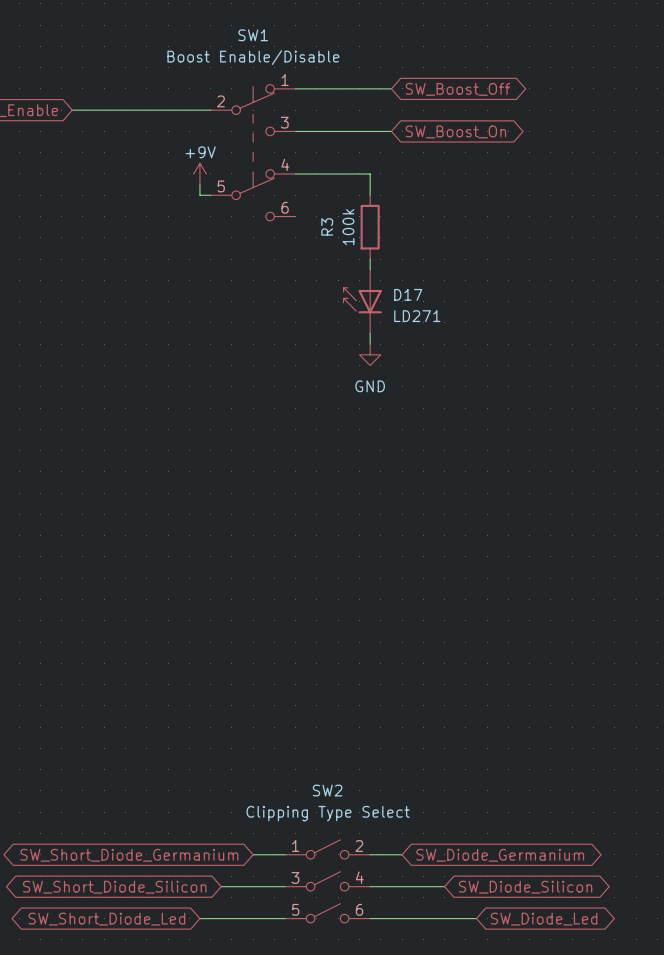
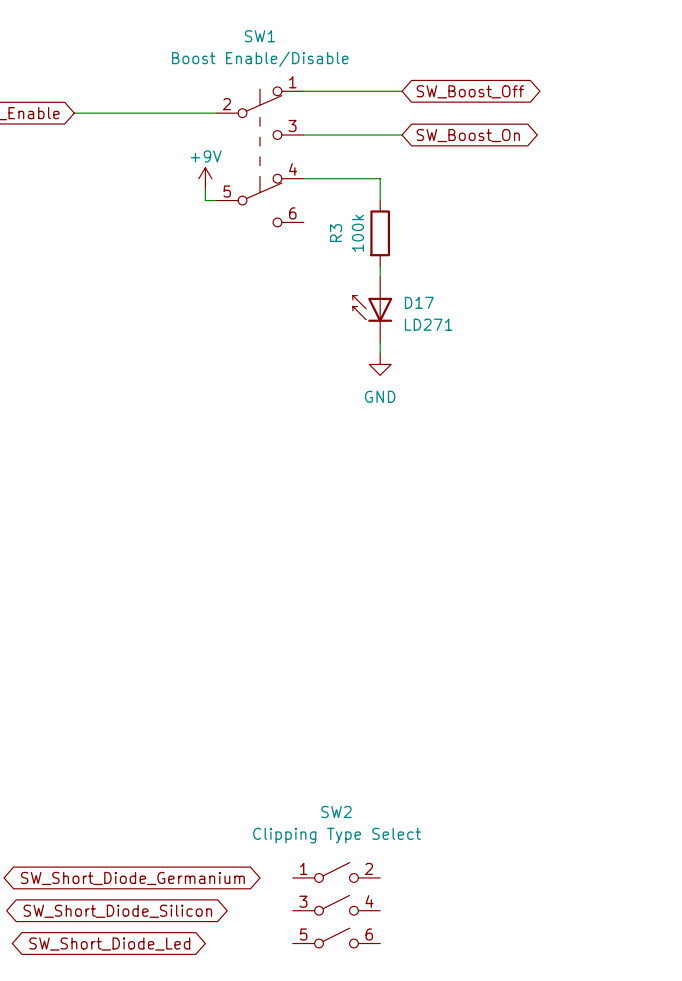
wire: (253, 854) (285, 854) -> none
wire: (370, 854) (402, 854) -> none
global label: SW_Diode_Germanium (500, 855) -> none
wire: (221, 886) (285, 886) -> none
wire: (370, 886) (444, 886) -> none
global label: SW_Diode_Silicon (525, 887) -> none
wire: (199, 918) (285, 918) -> none
wire: (370, 918) (476, 918) -> none
global label: SW_Diode_Led (544, 919) -> none

